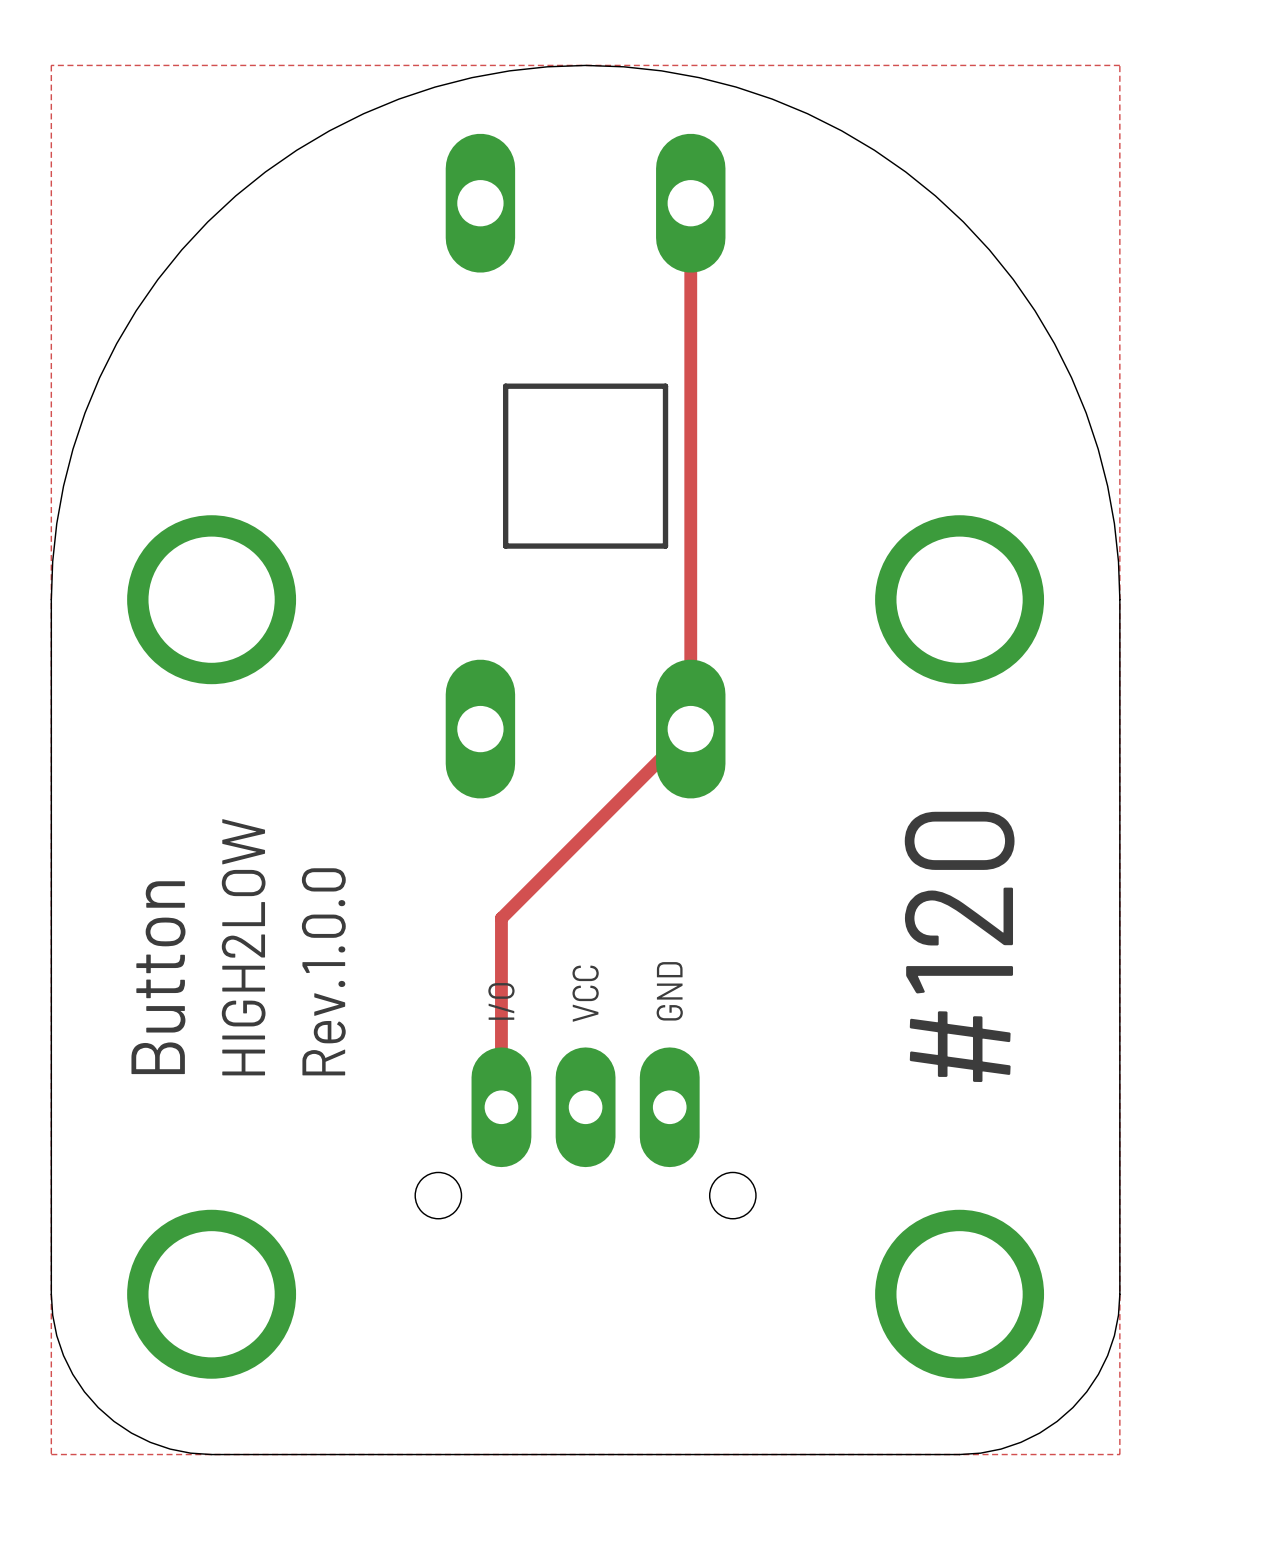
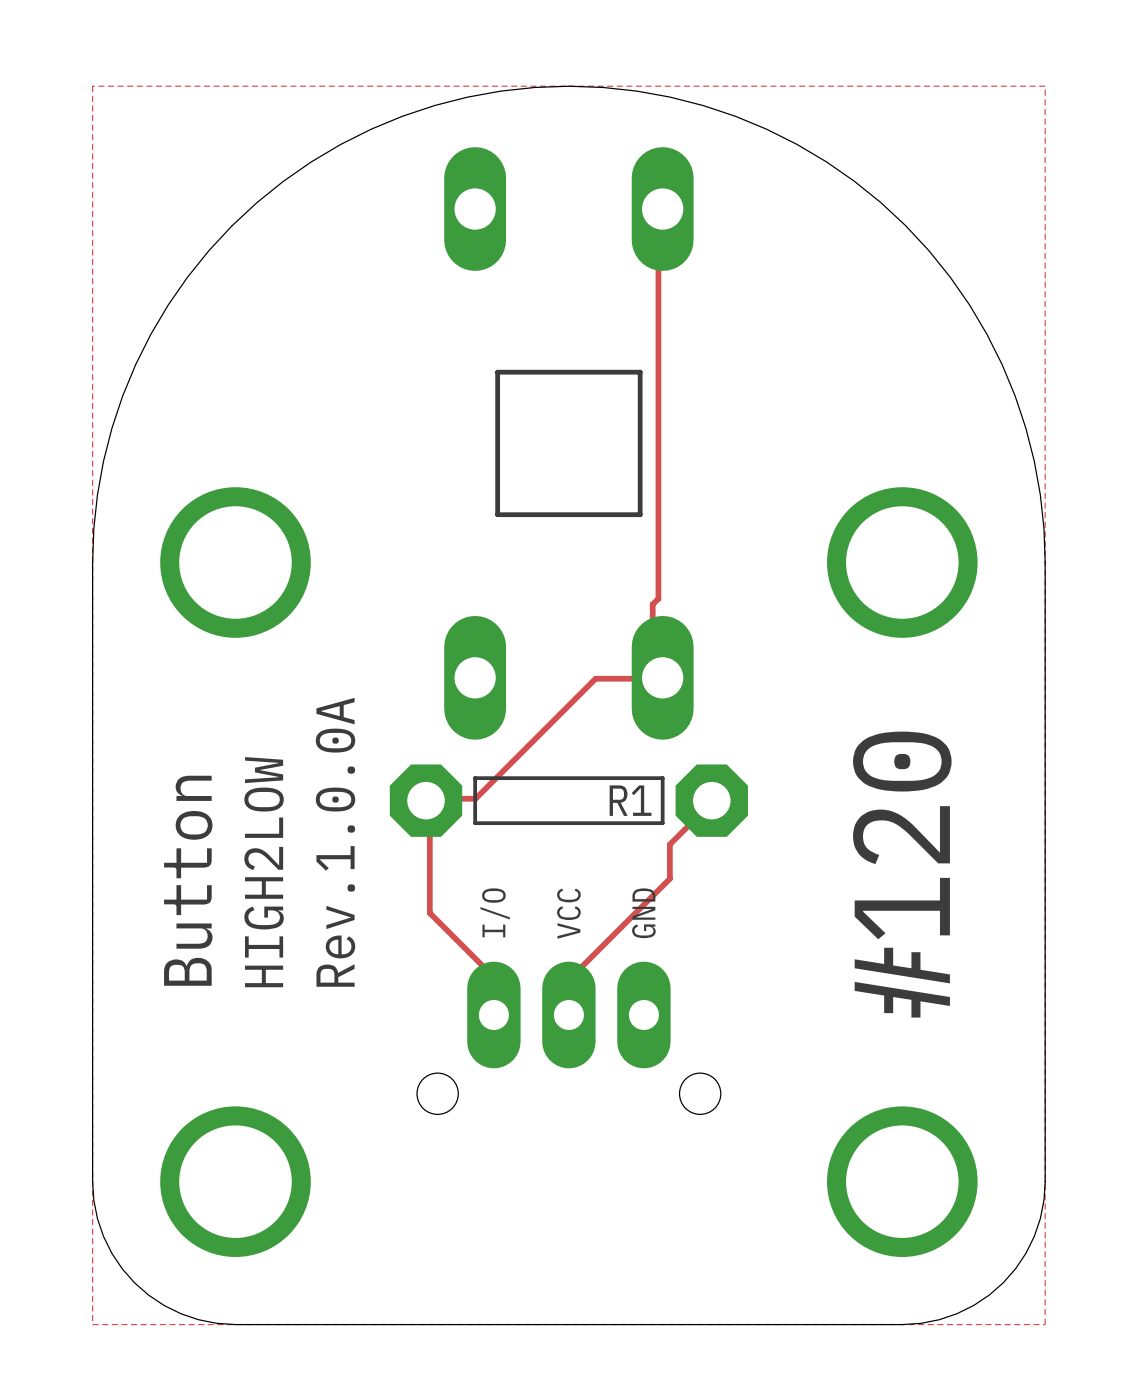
track: (690, 203) (690, 729) (501, 918) (501, 1107) -> (662, 209) (658, 210) (658, 598) (652, 604) (652, 678) (662, 677) (658, 678) (595, 678) (475, 798) (429, 798) (426, 800) (429, 804) (429, 913) (492, 975) (493, 1014)
R1: none -> (568, 800)
track: none -> (711, 800) (669, 844) (669, 878) (572, 975) (572, 1010) (568, 1014)
text: Rev.1.0.0 (323, 971) -> Rev.1.0.0A (335, 842)

